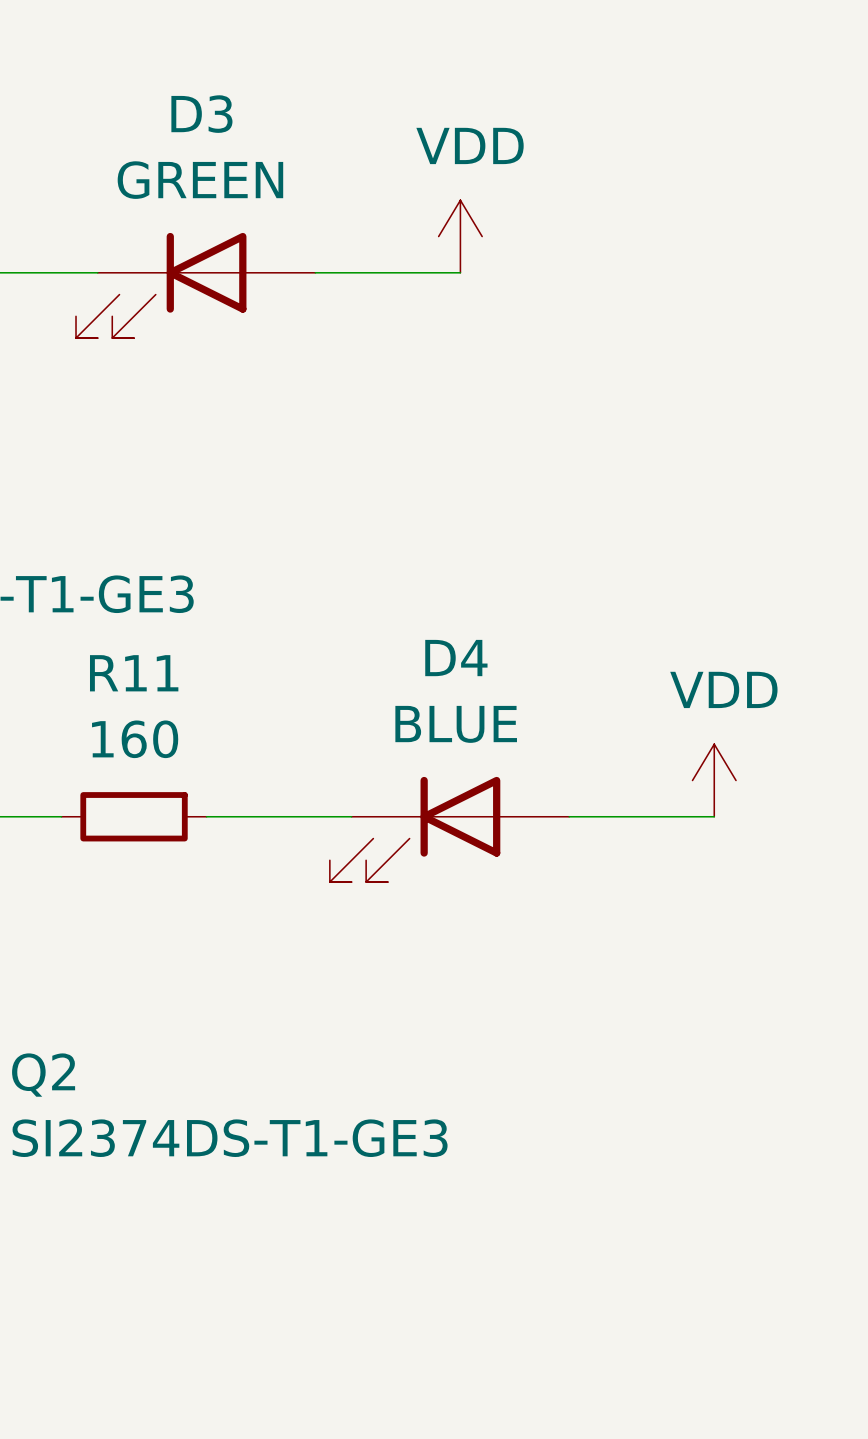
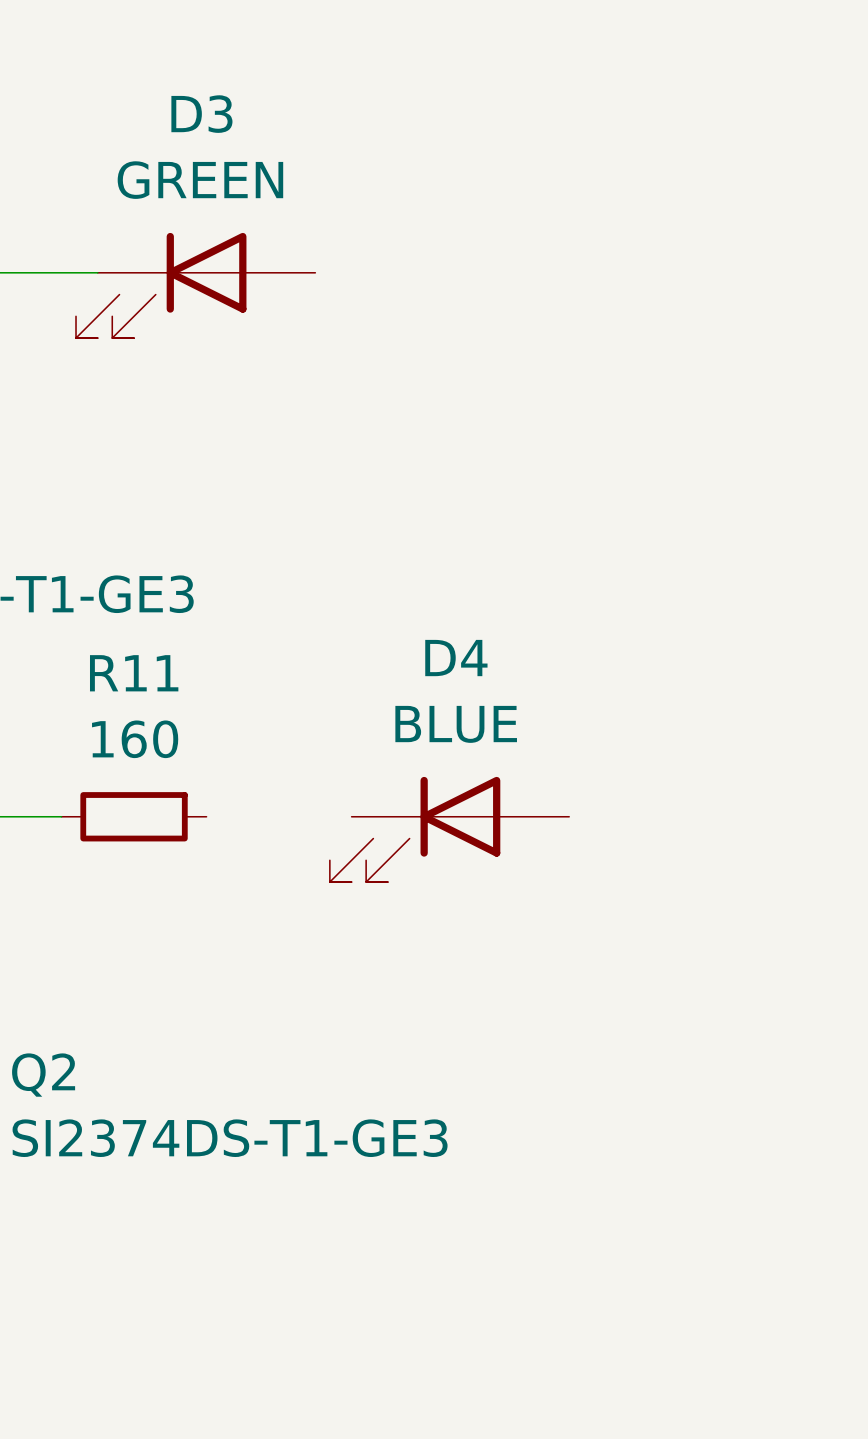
power symbol: VDD (460, 236) -> none
wire: (315, 272) (460, 272) -> none
power symbol: VDD (714, 780) -> none
wire: (206, 816) (351, 816) -> none
wire: (569, 816) (714, 816) -> none

